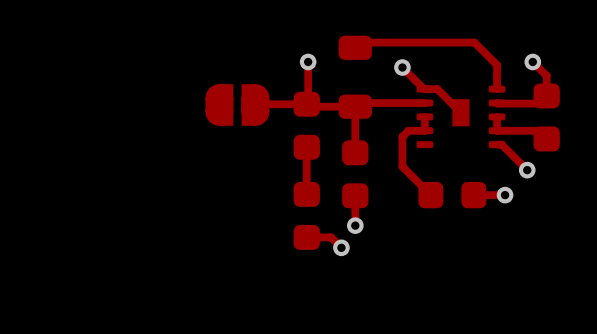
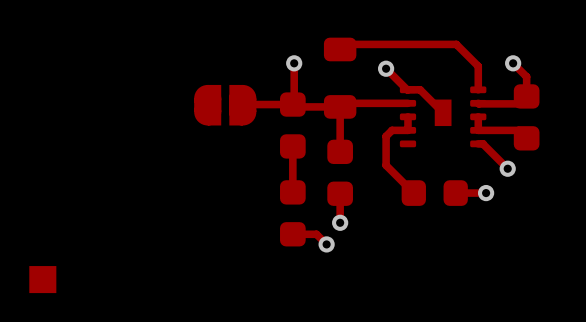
part: none -> (42, 279)

